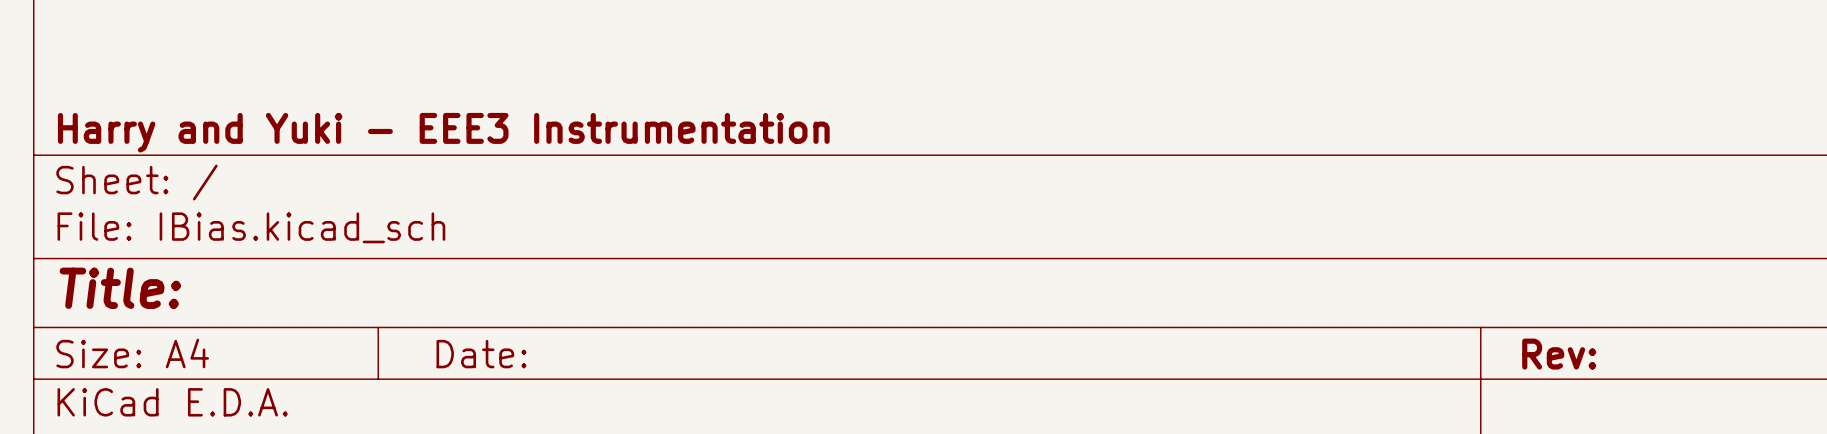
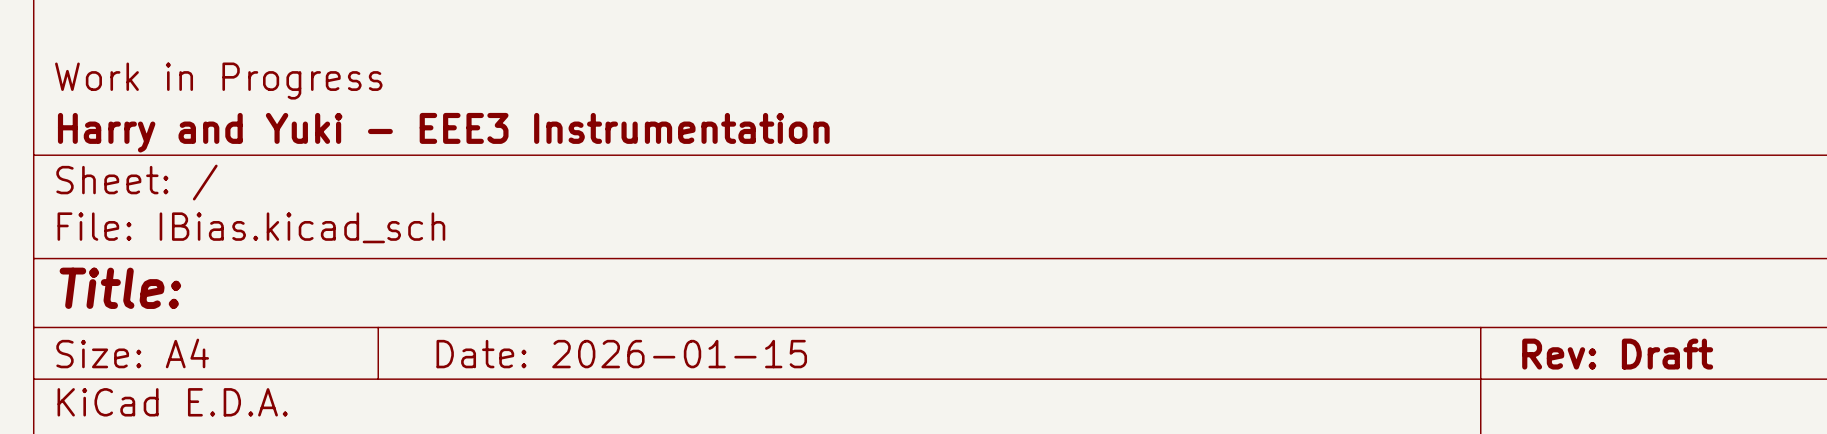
title block: none -> Work in Progress (218, 81)
title block: Date: (481, 354) -> Date: 2026-01-15 (621, 354)
title block: Rev: (1559, 354) -> Rev: Draft (1617, 354)

